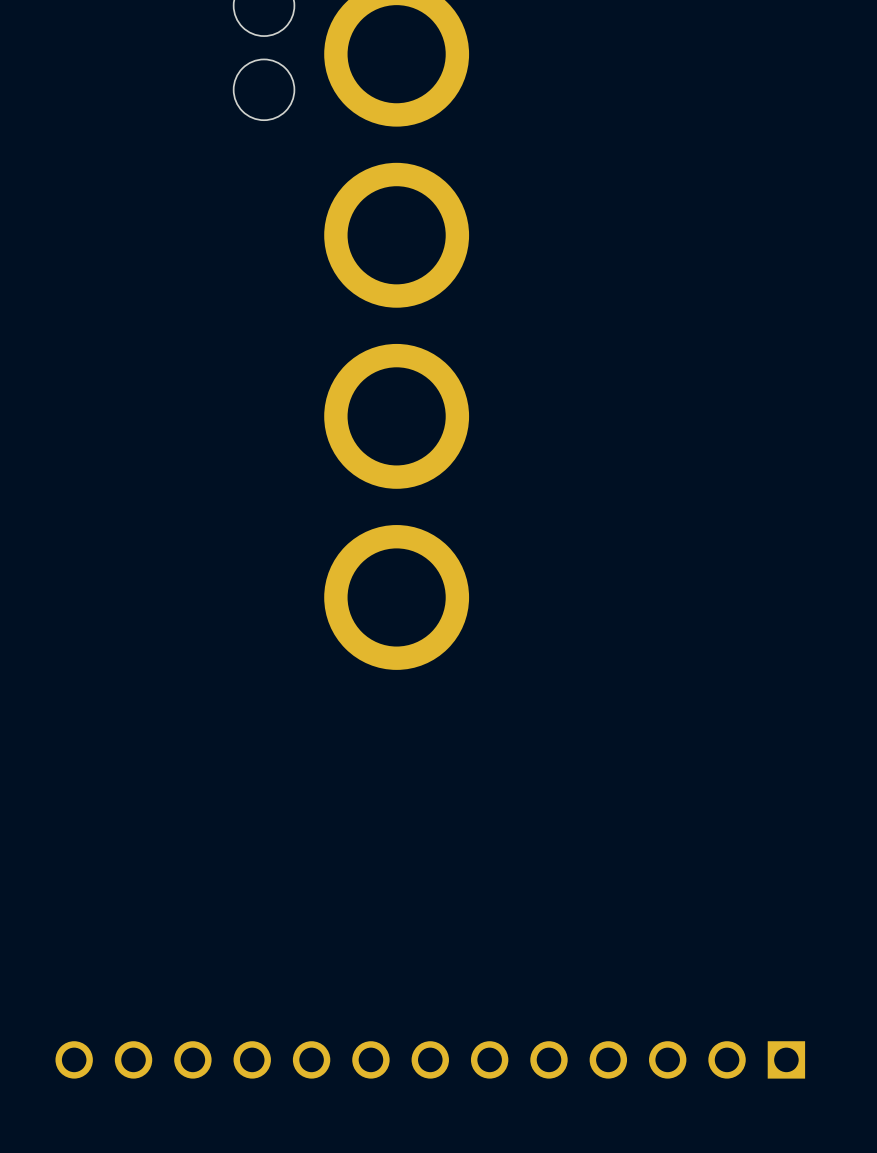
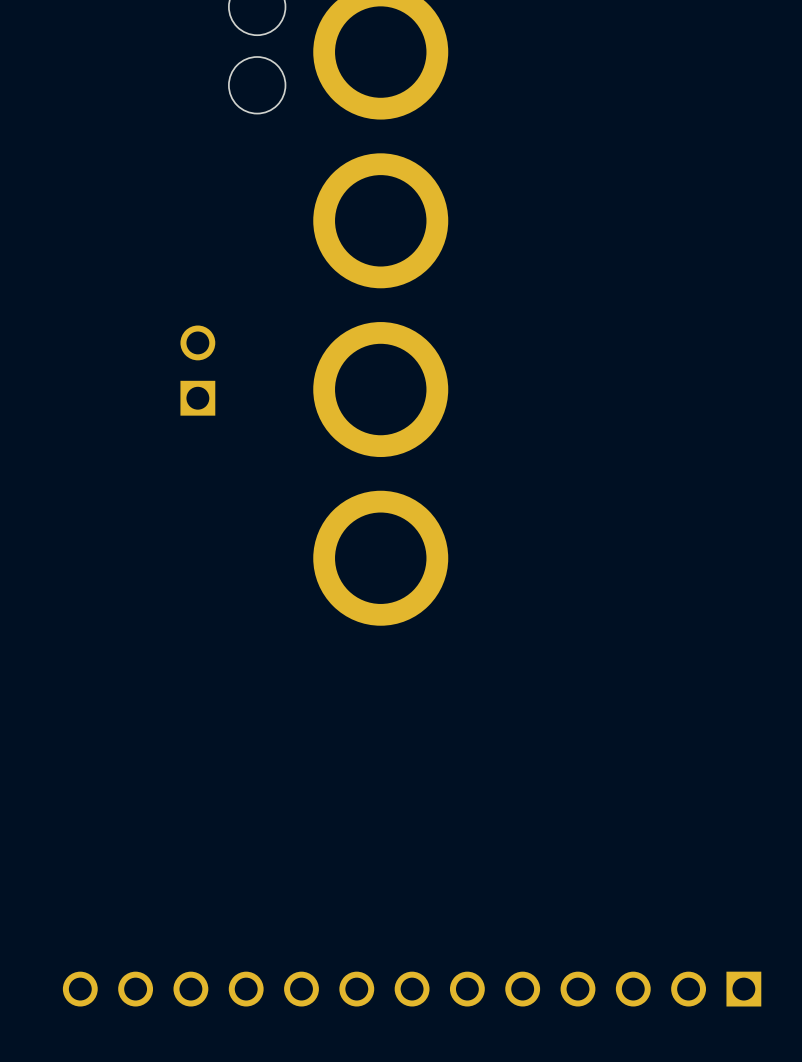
part: none -> (197, 370)

